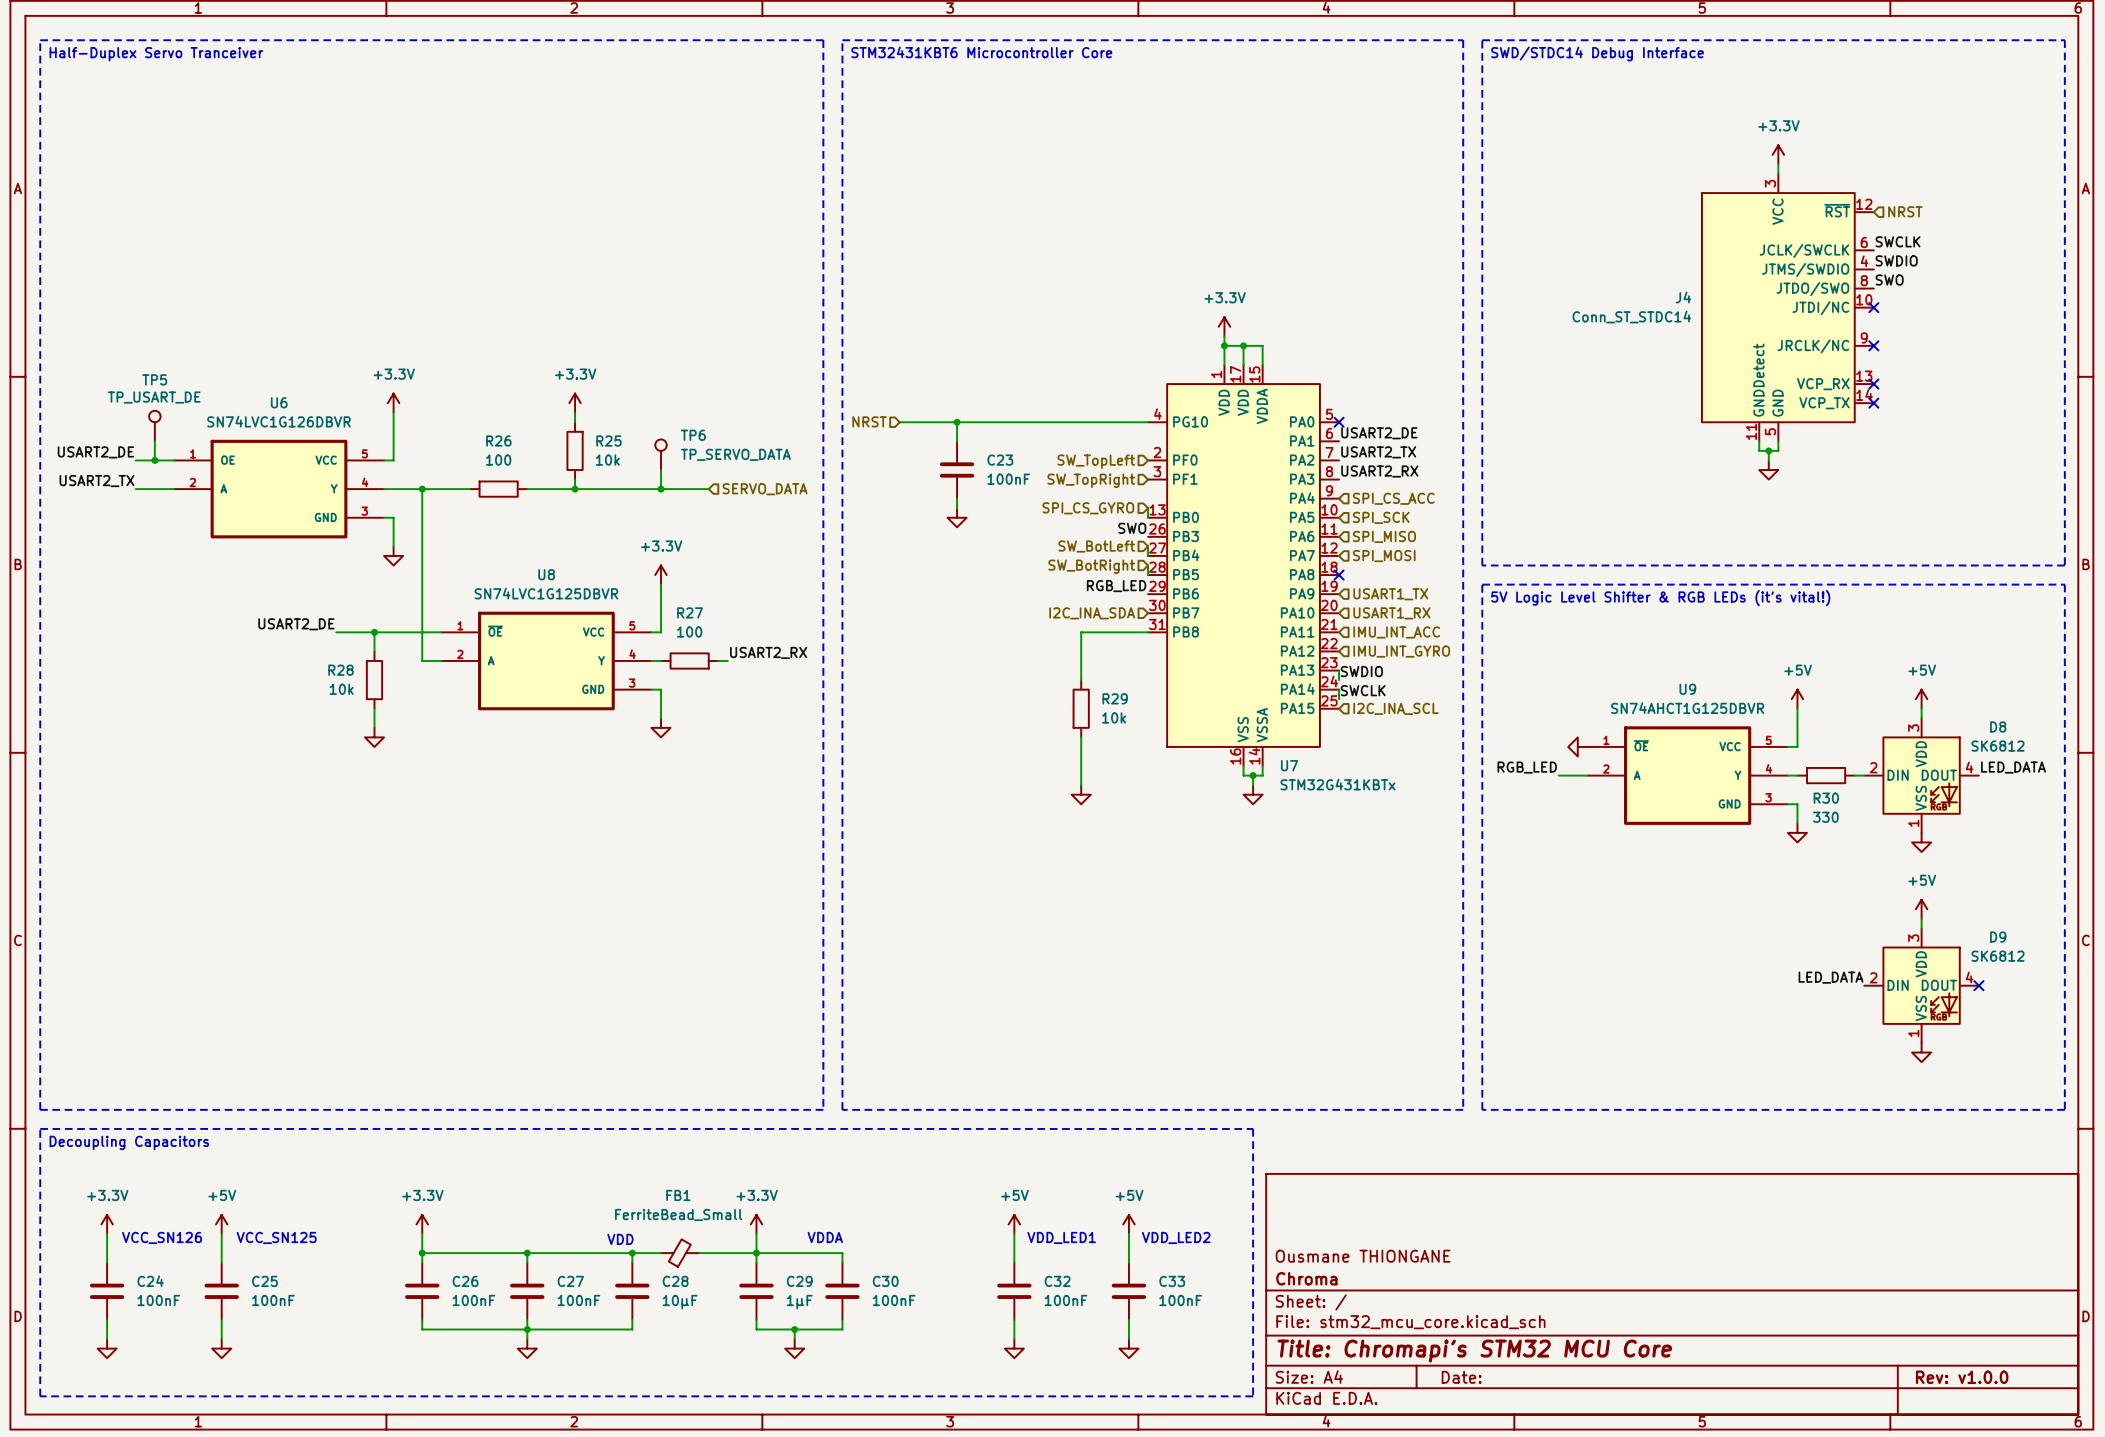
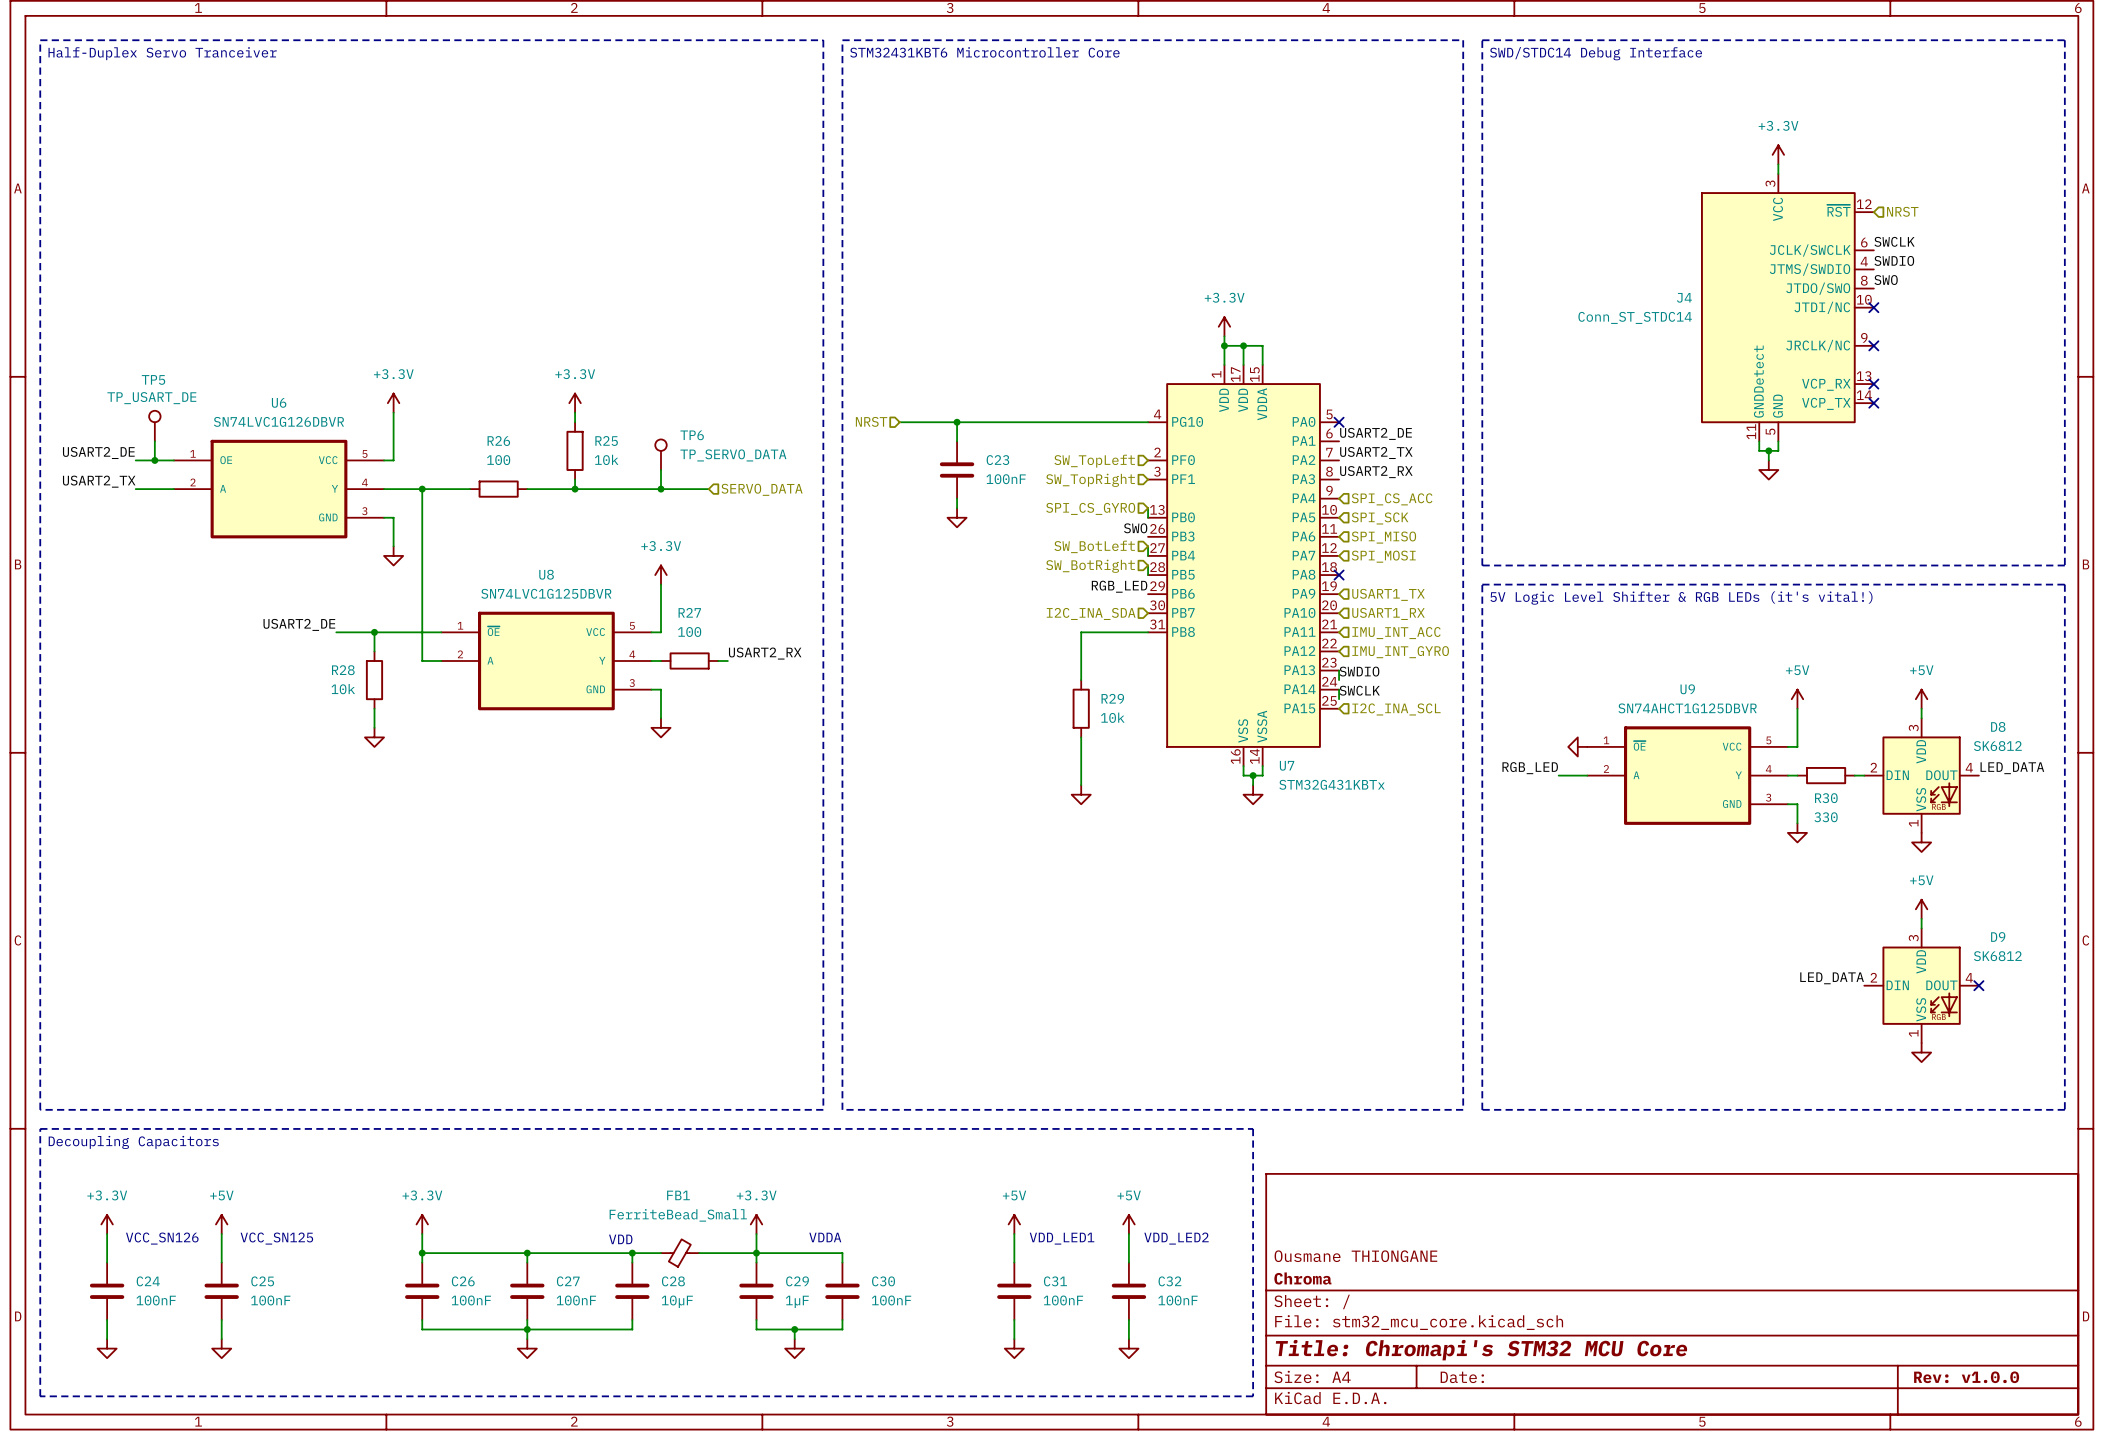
C32 name: C32 (1057, 1281) -> C31 (1055, 1281)
C33 name: C33 (1172, 1281) -> C32 (1169, 1281)

